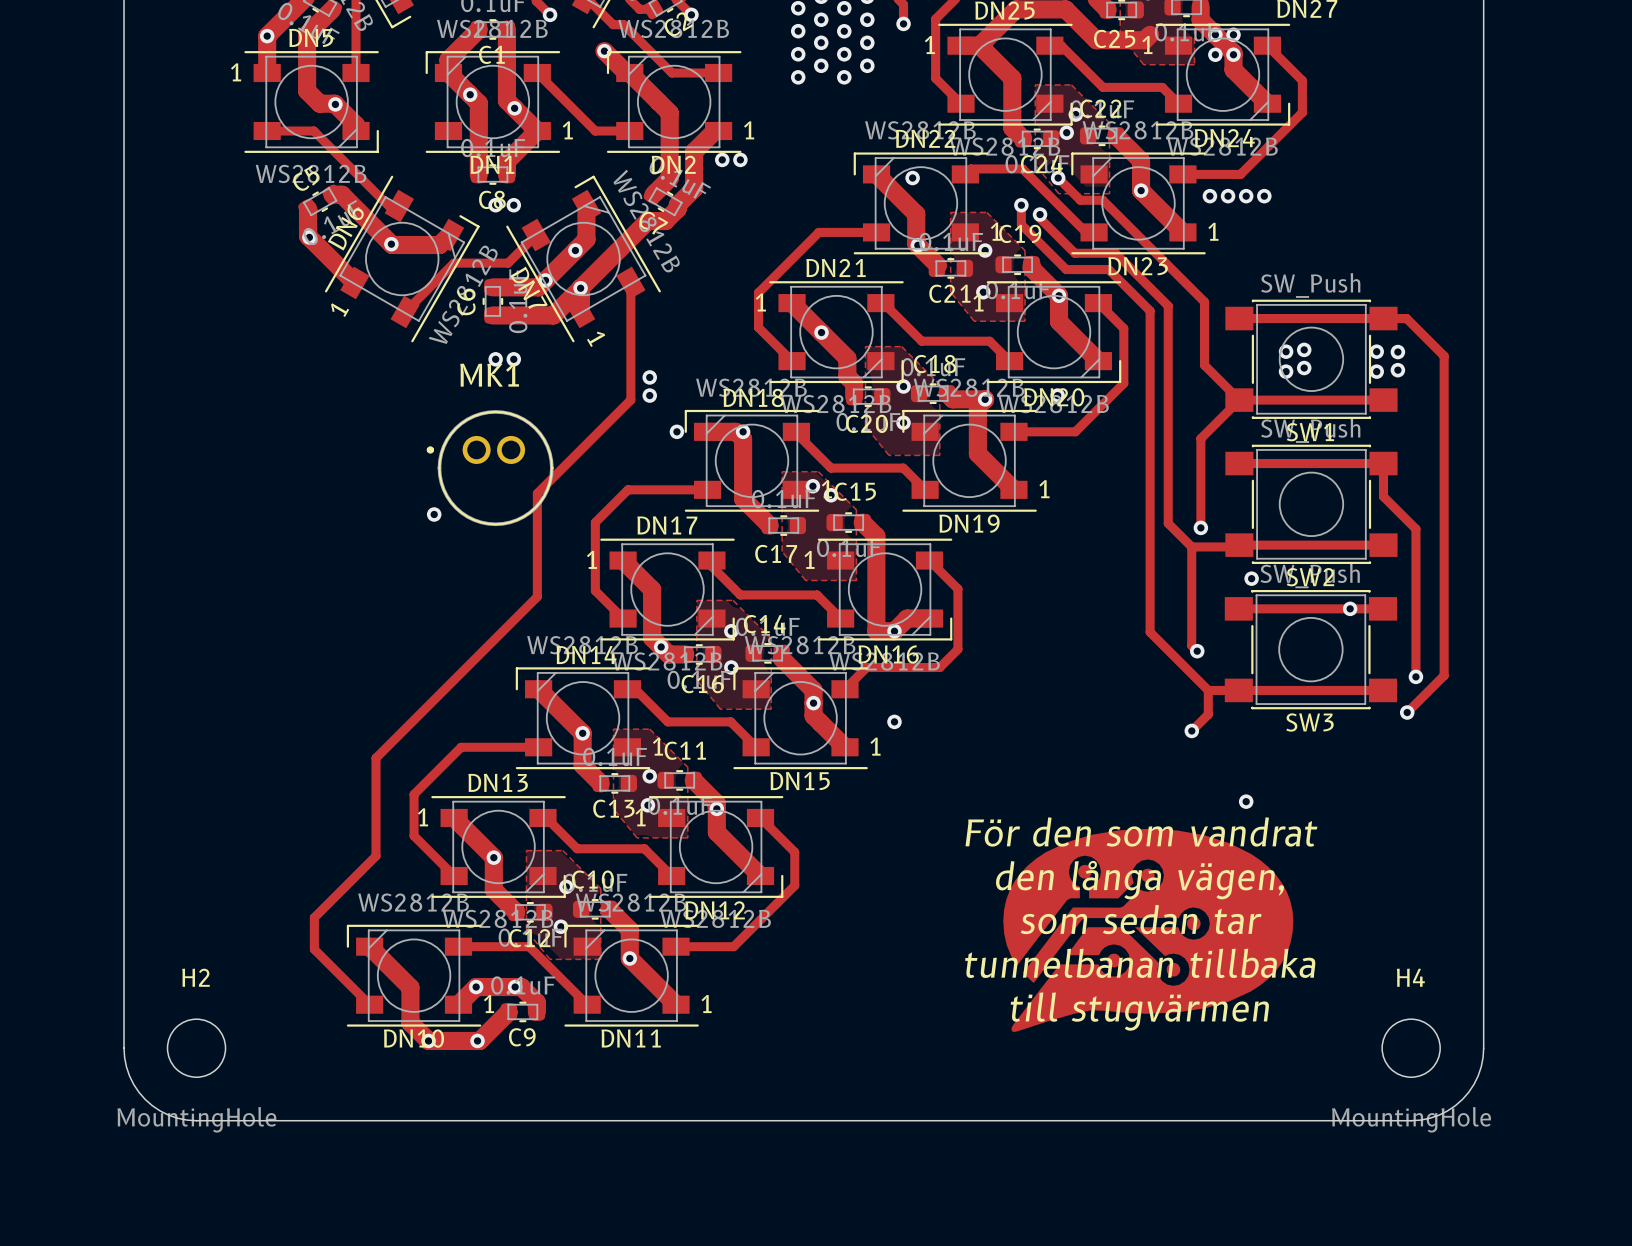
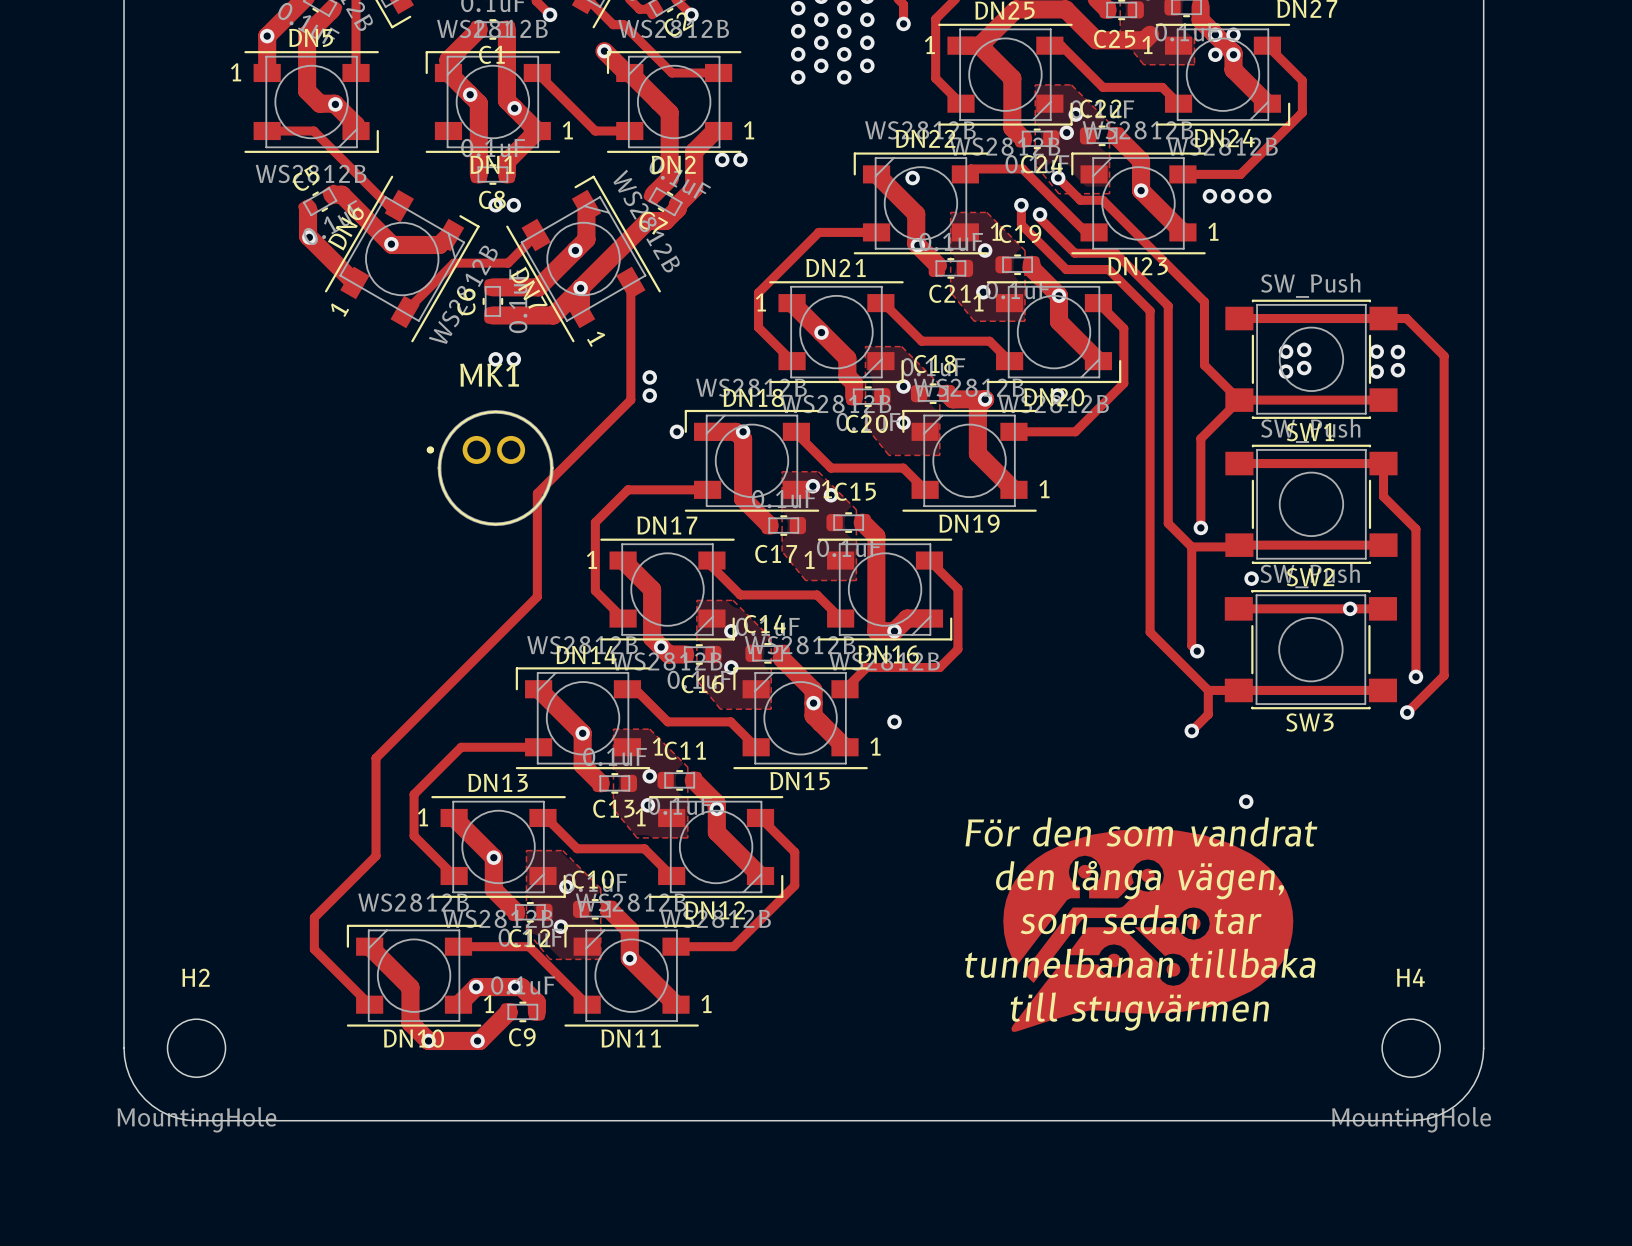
via: (545, 280) -> none
via: (434, 514) -> none

